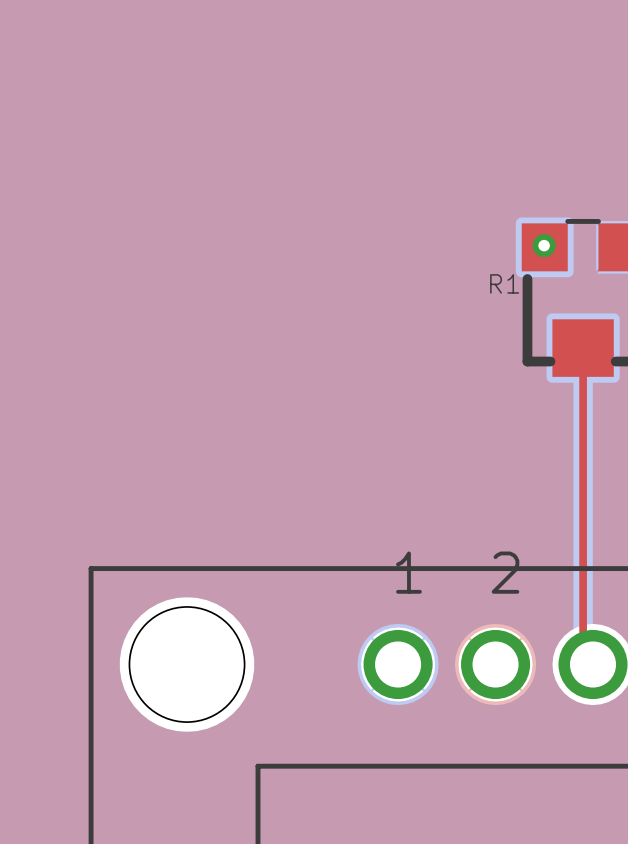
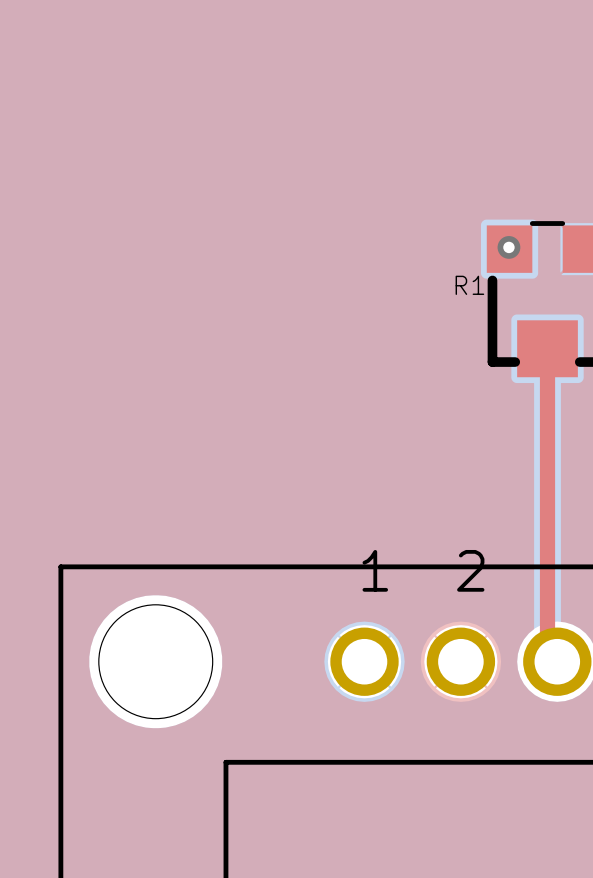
top track width: thin (583, 348) (583, 654) -> thick (547, 348) (547, 651)

